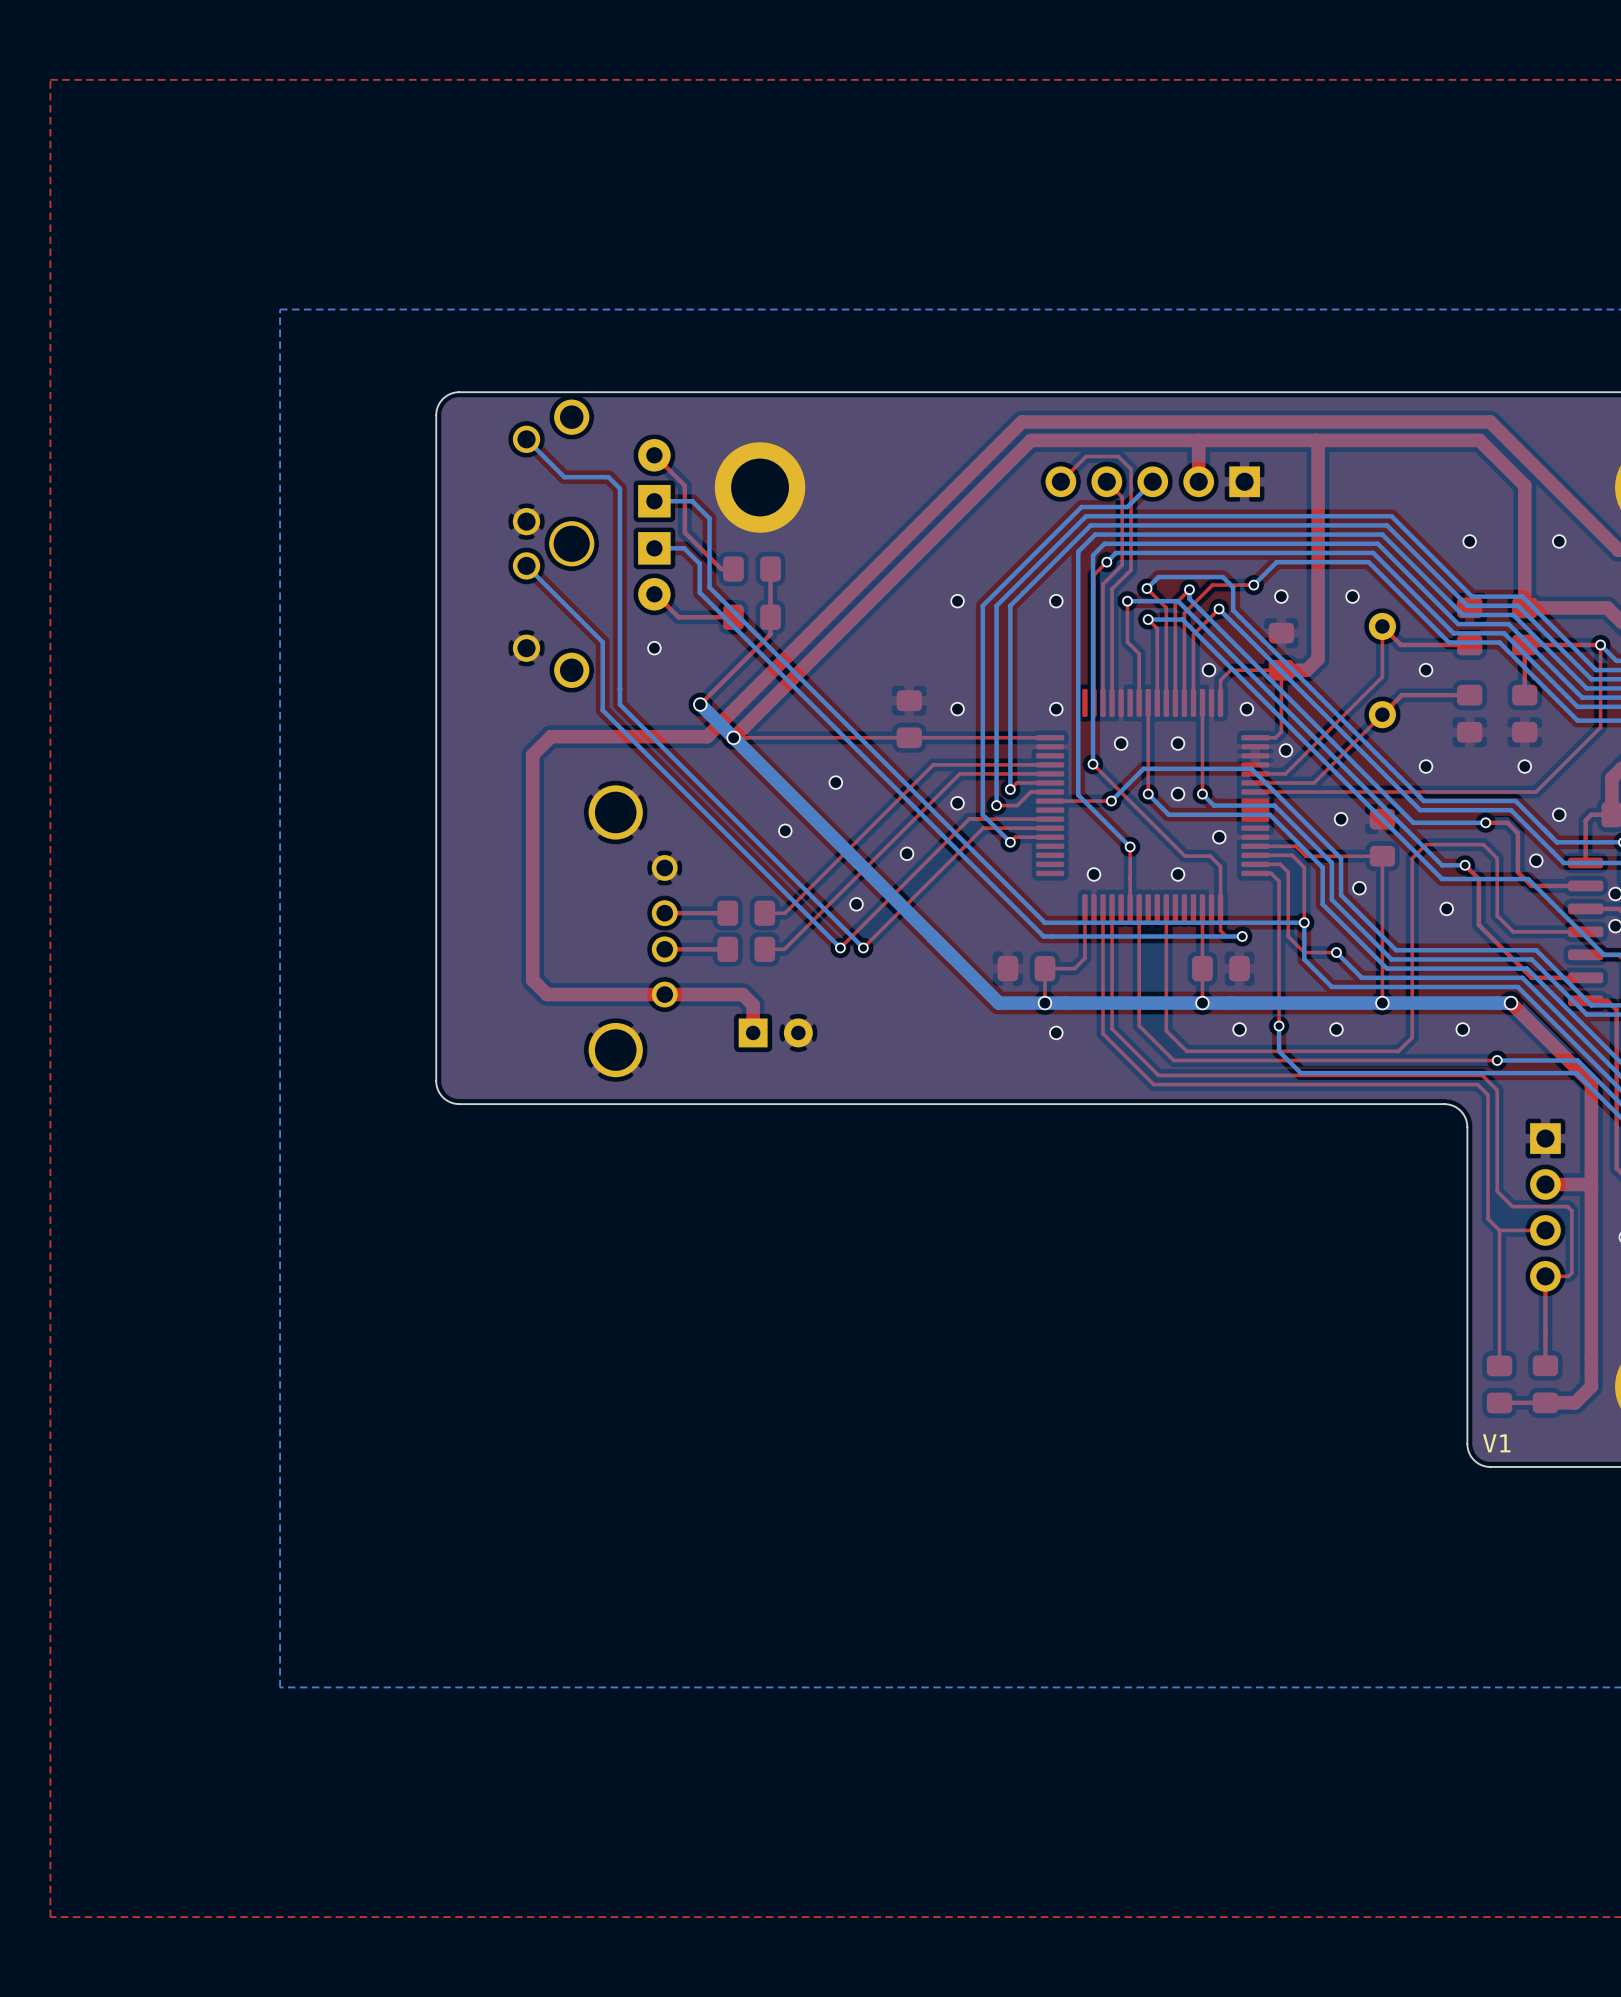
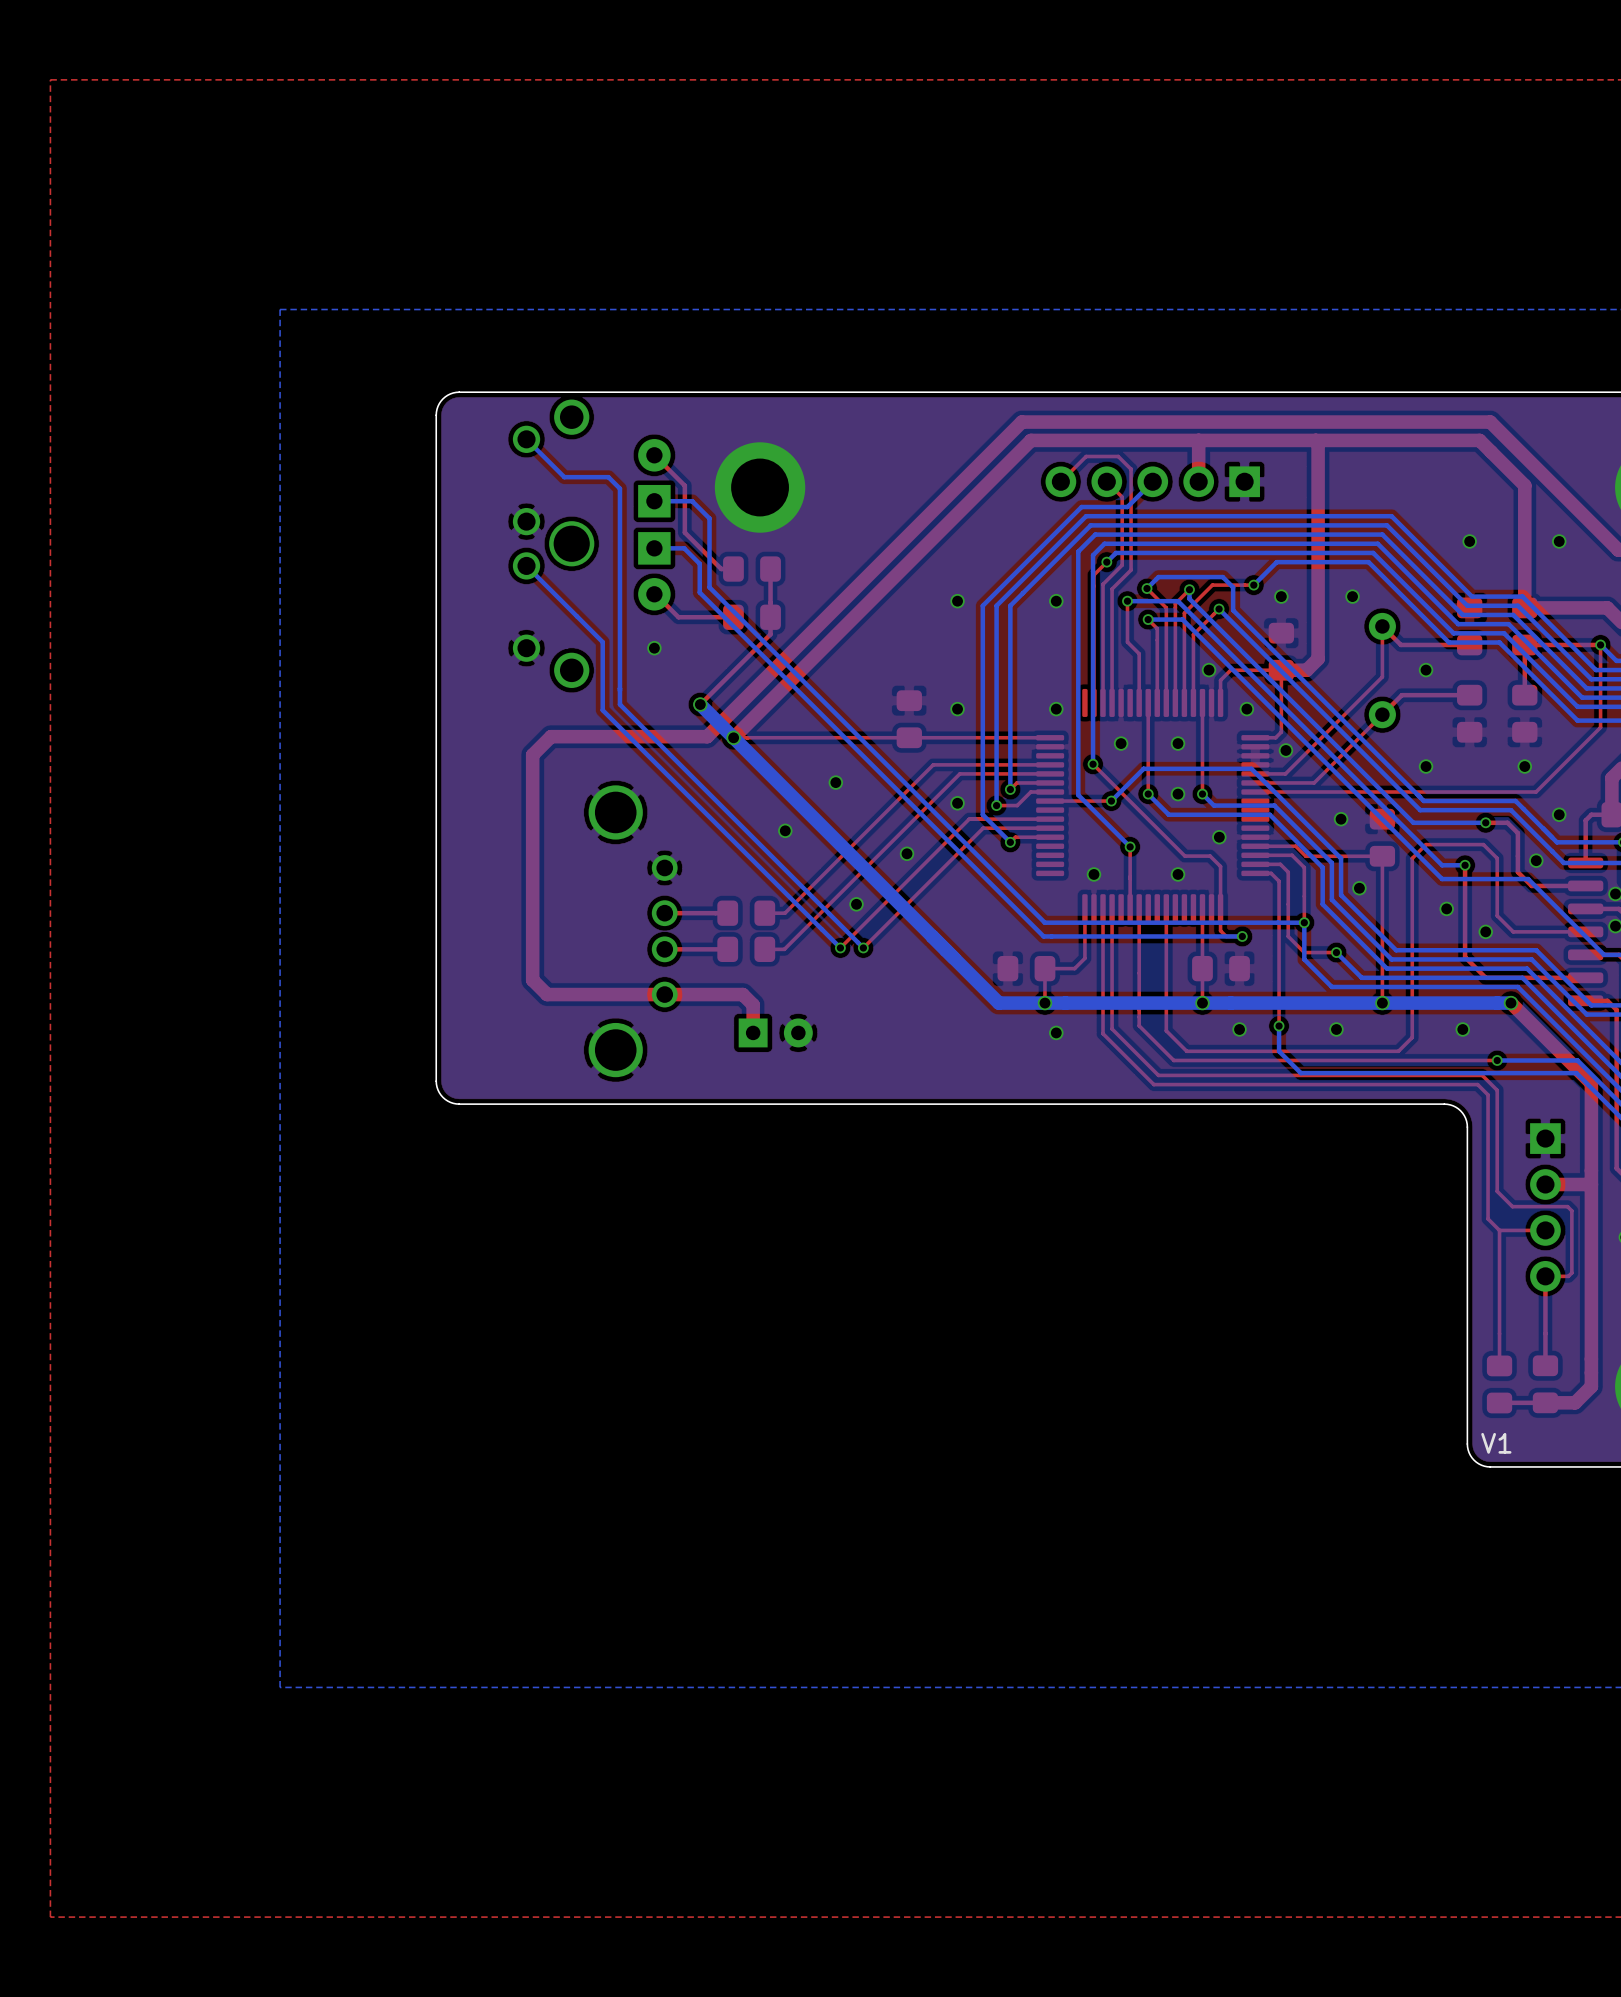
top track: (1465, 865) (1478, 879) (1478, 924) (1531, 977) -> (1465, 865) (1465, 957) (1485, 977) (1531, 977)
via: none -> (1485, 931)

